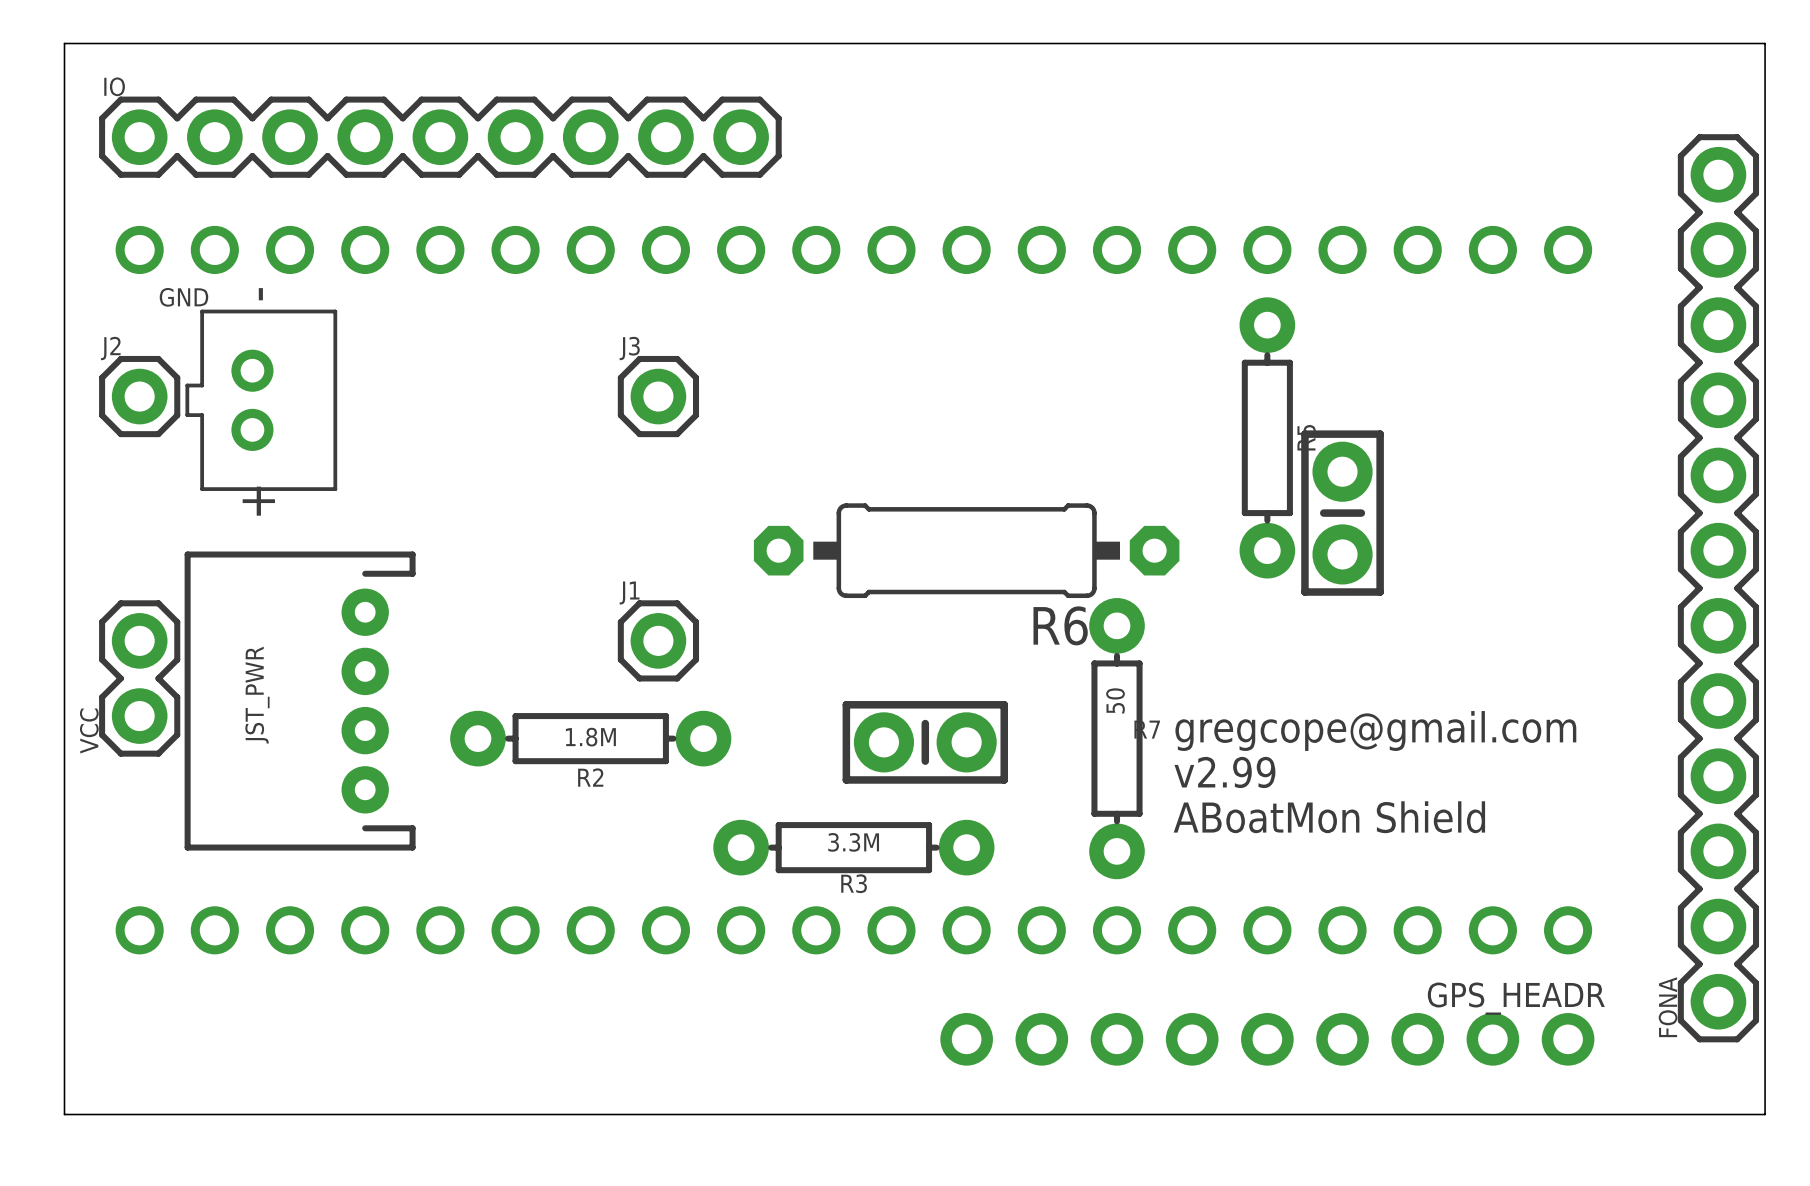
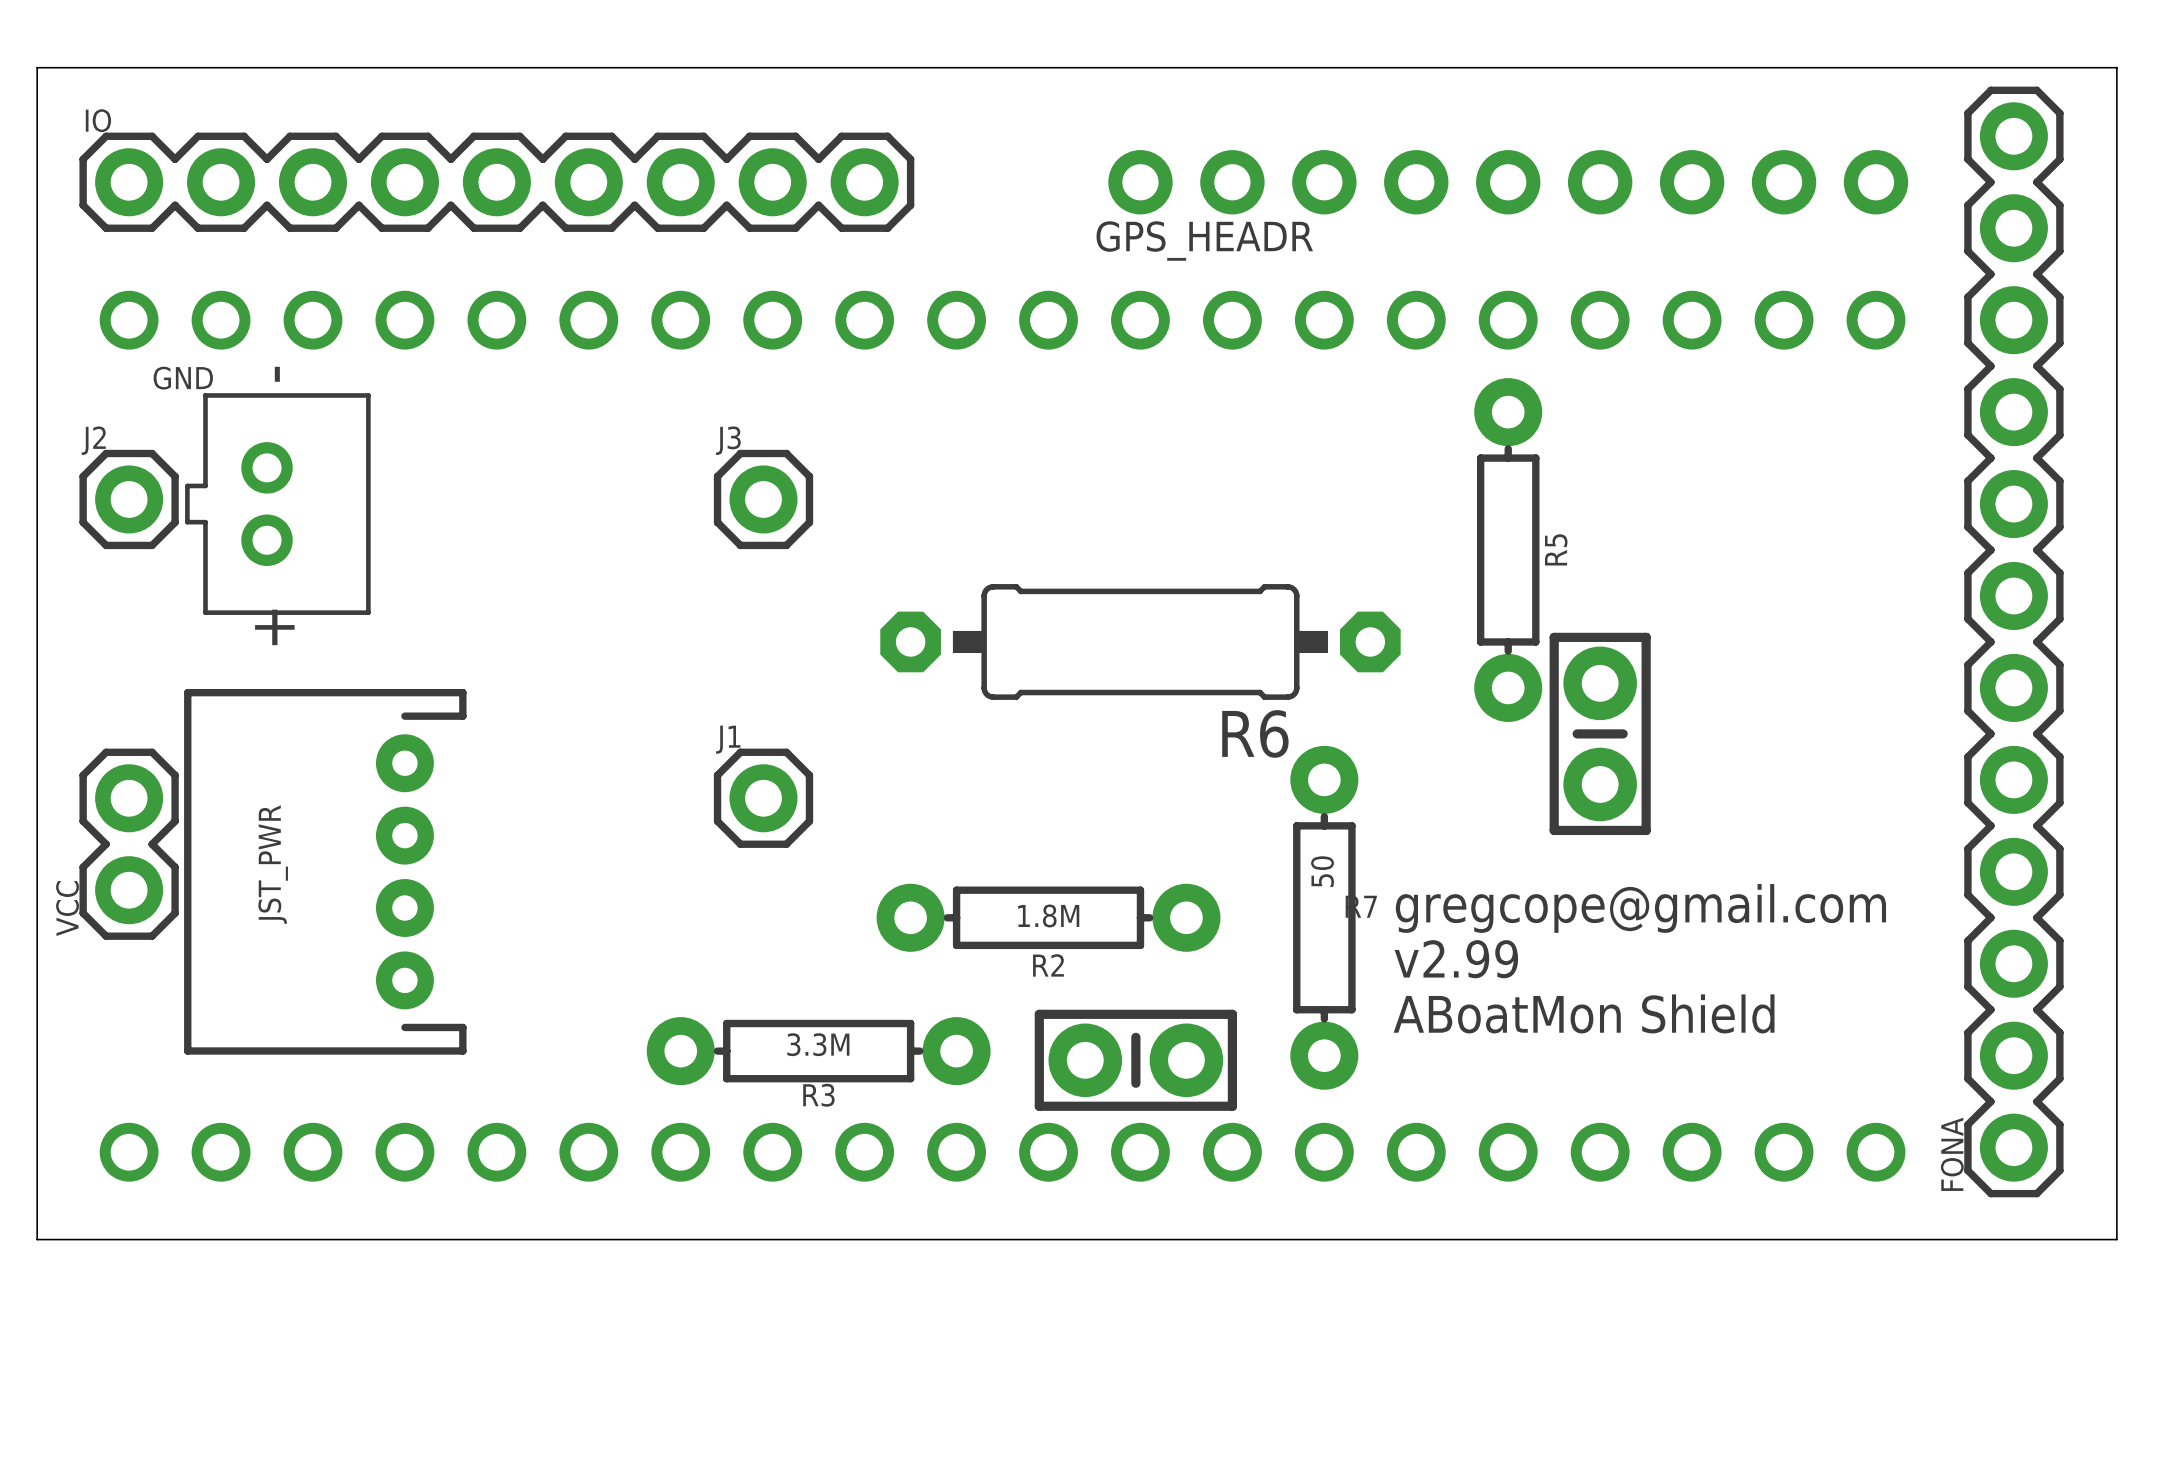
part: none -> GPS_HEADR (1508, 182)
part position: (1342, 513) -> (1600, 733)
R6 position: (966, 550) -> (1140, 641)
FONA position: (1718, 588) -> (2013, 641)
R2 position: (590, 738) -> (1048, 917)
part position: (925, 742) -> (1135, 1060)
R3 position: (853, 847) -> (818, 1051)
board edge: (64, 1001) (64, 1114) (1765, 1114) (1765, 1001) -> (37, 1239) (2116, 1239)
part: GPS_HEADR (1267, 1039) -> none

